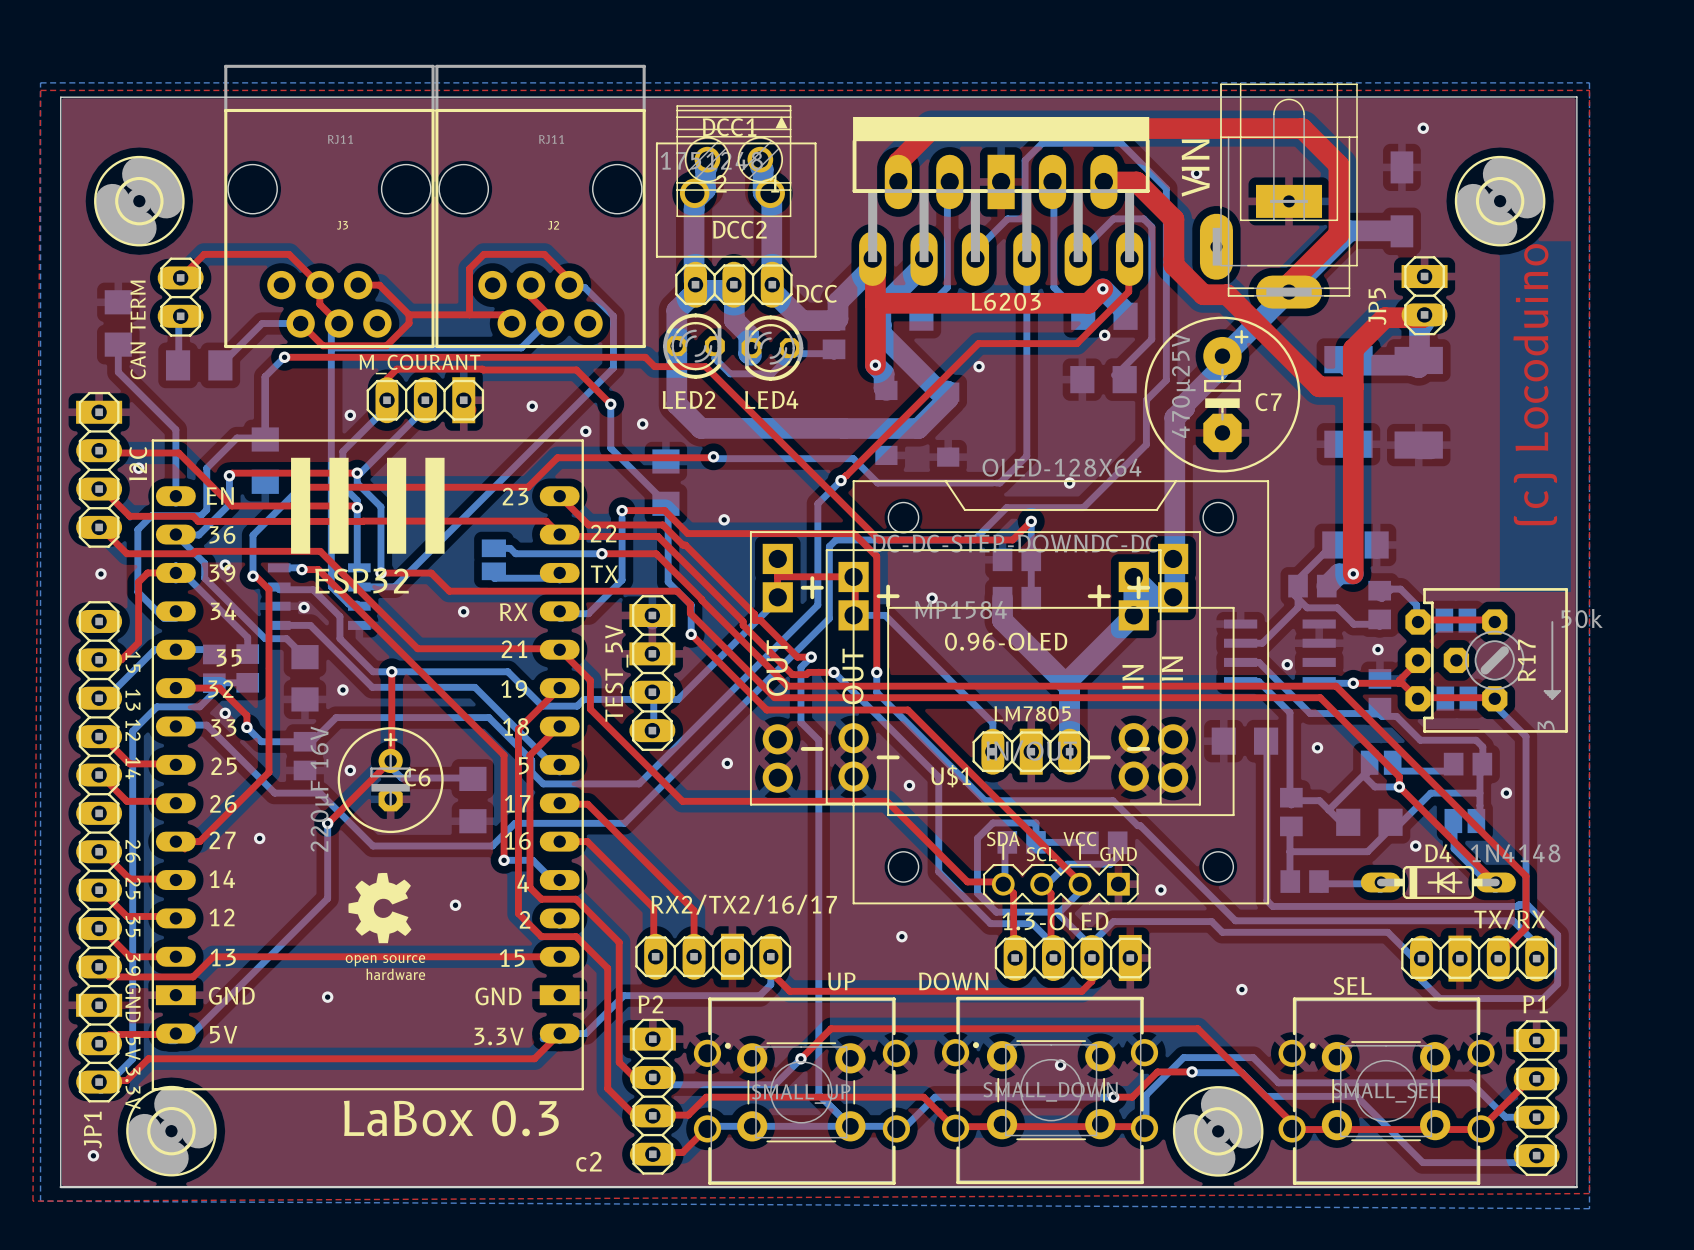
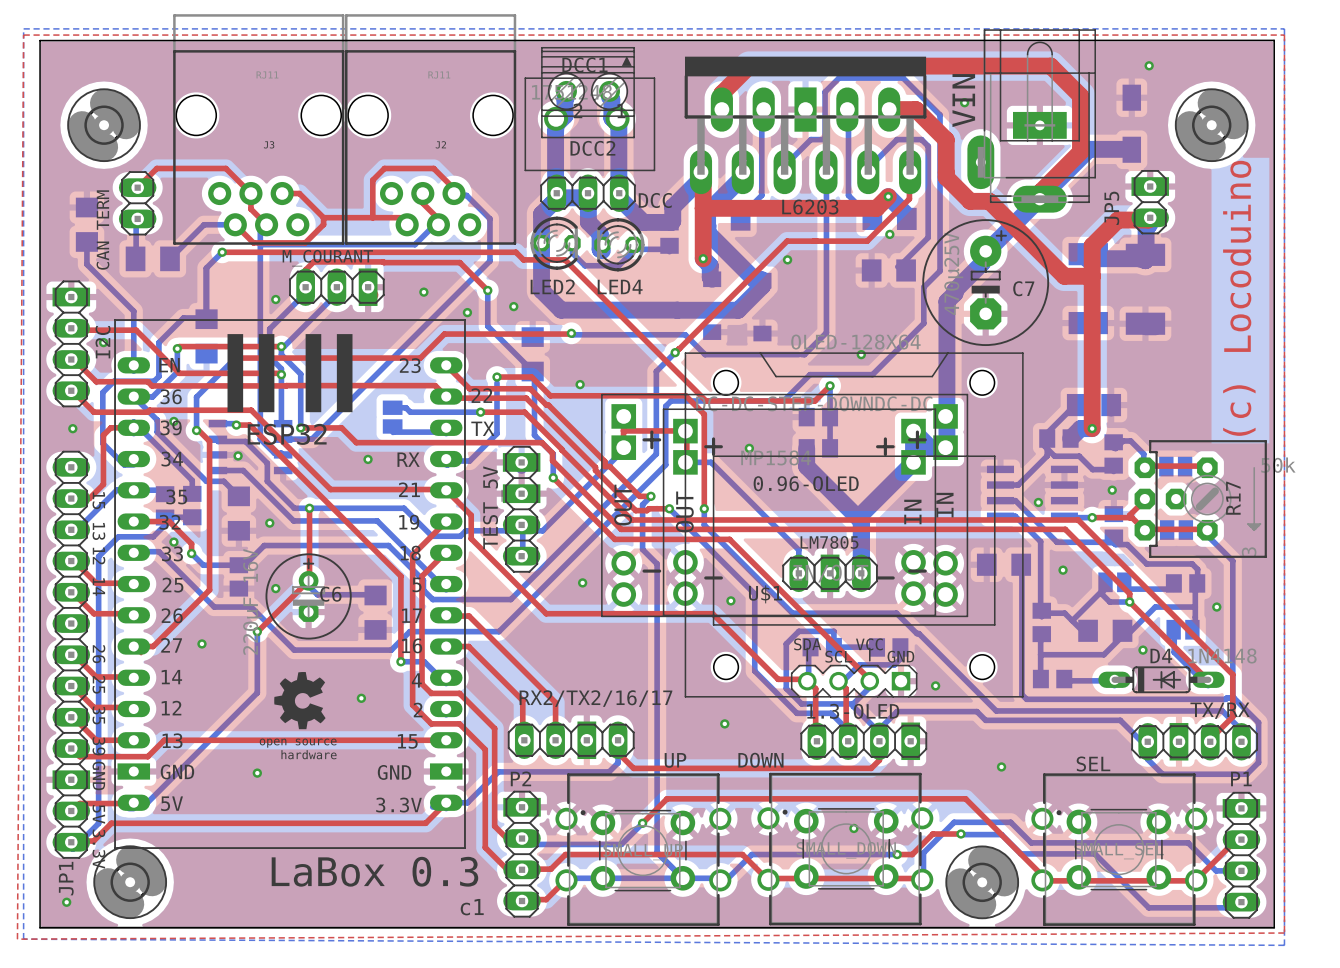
text: c2 (588, 1161) -> c1 (472, 907)

